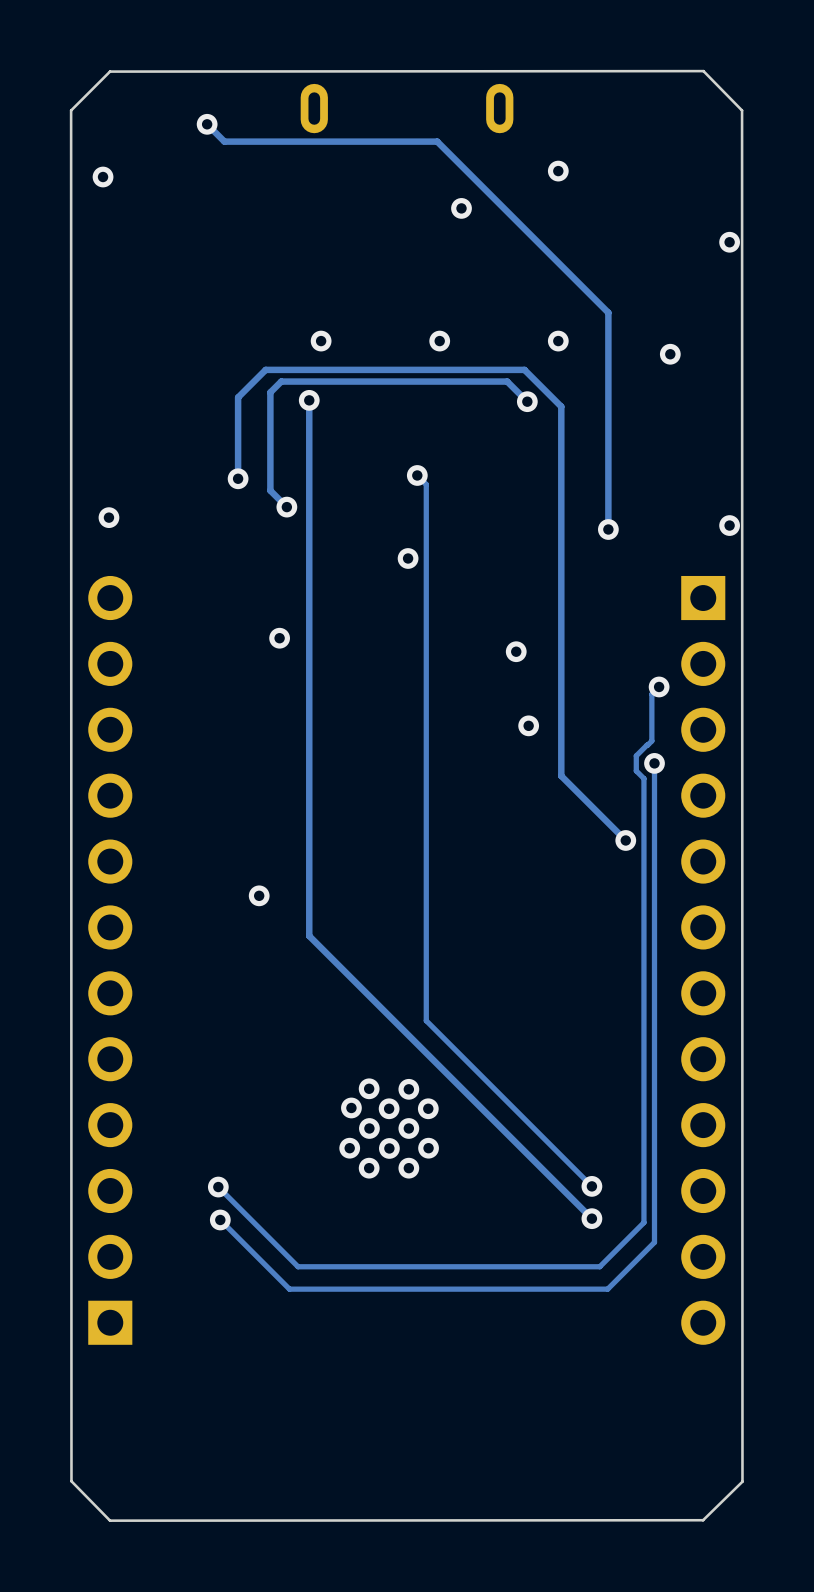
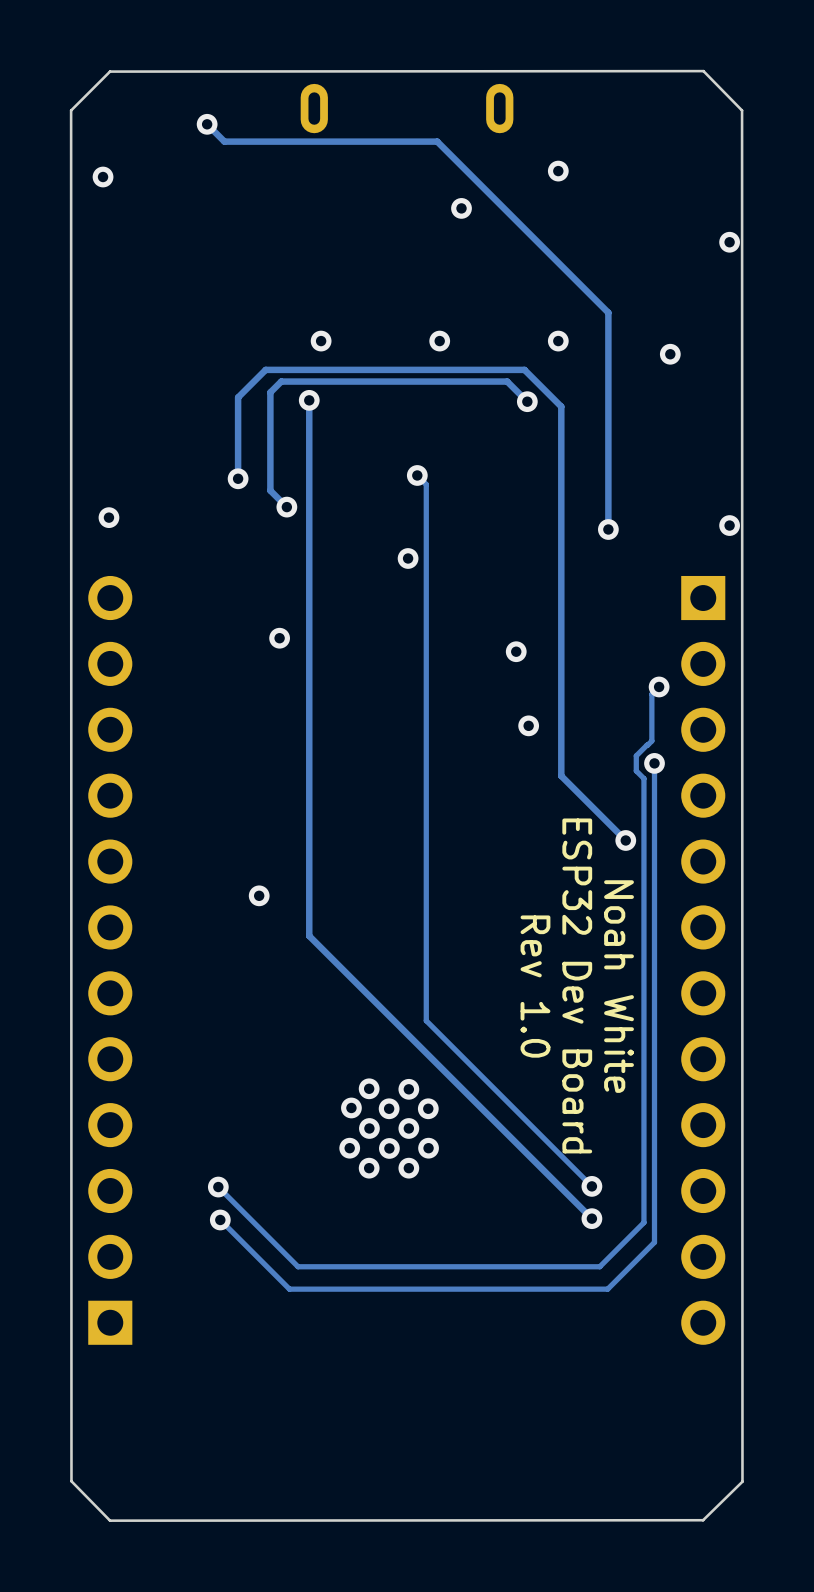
text: none -> ESP32 Dev Board (577, 985)
text: none -> Rev 1.0 (535, 986)
text: none -> Noah White (619, 986)

